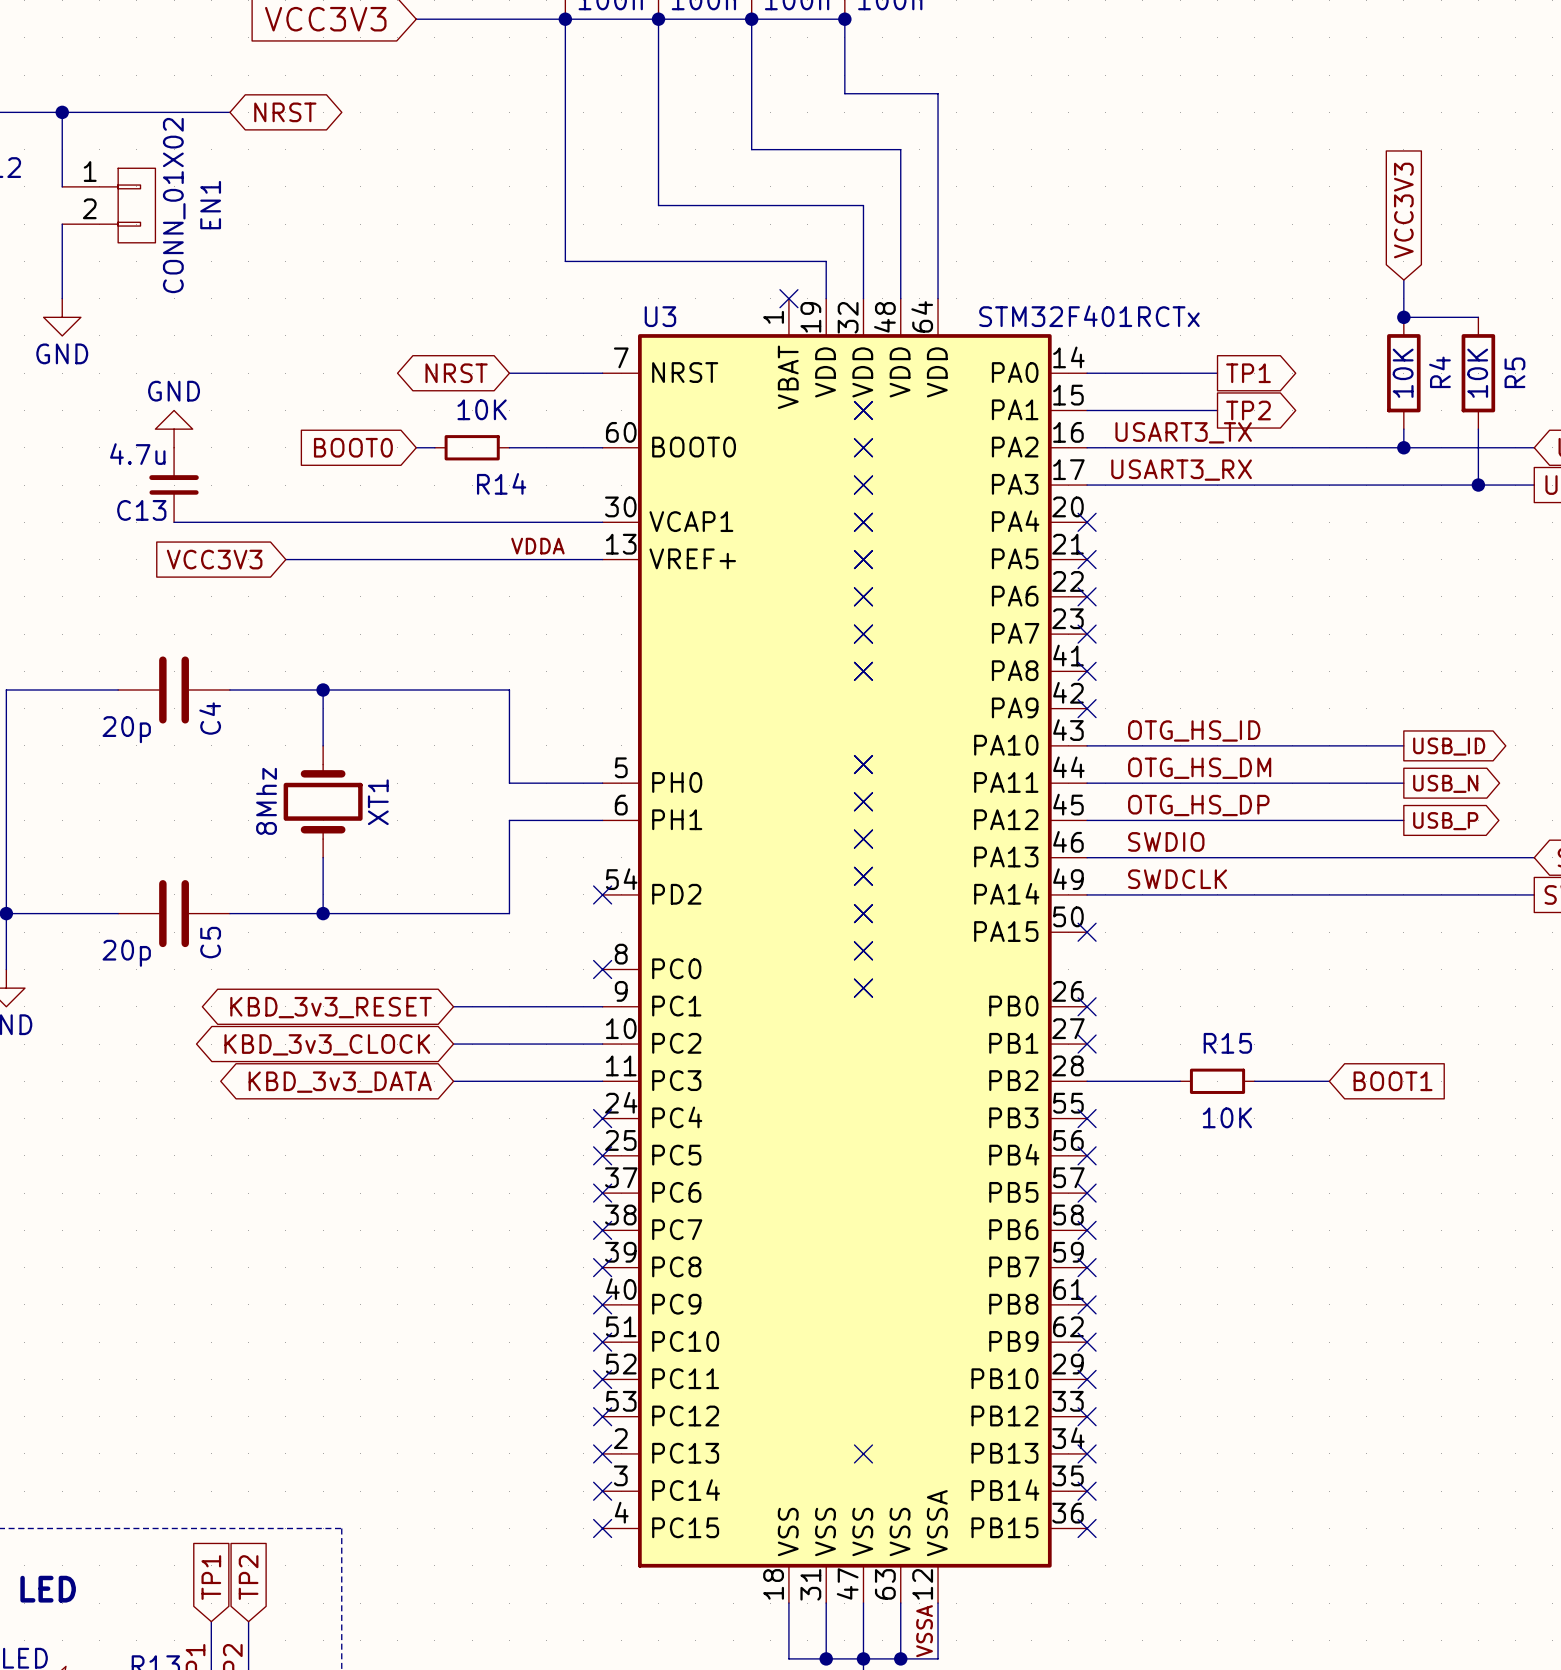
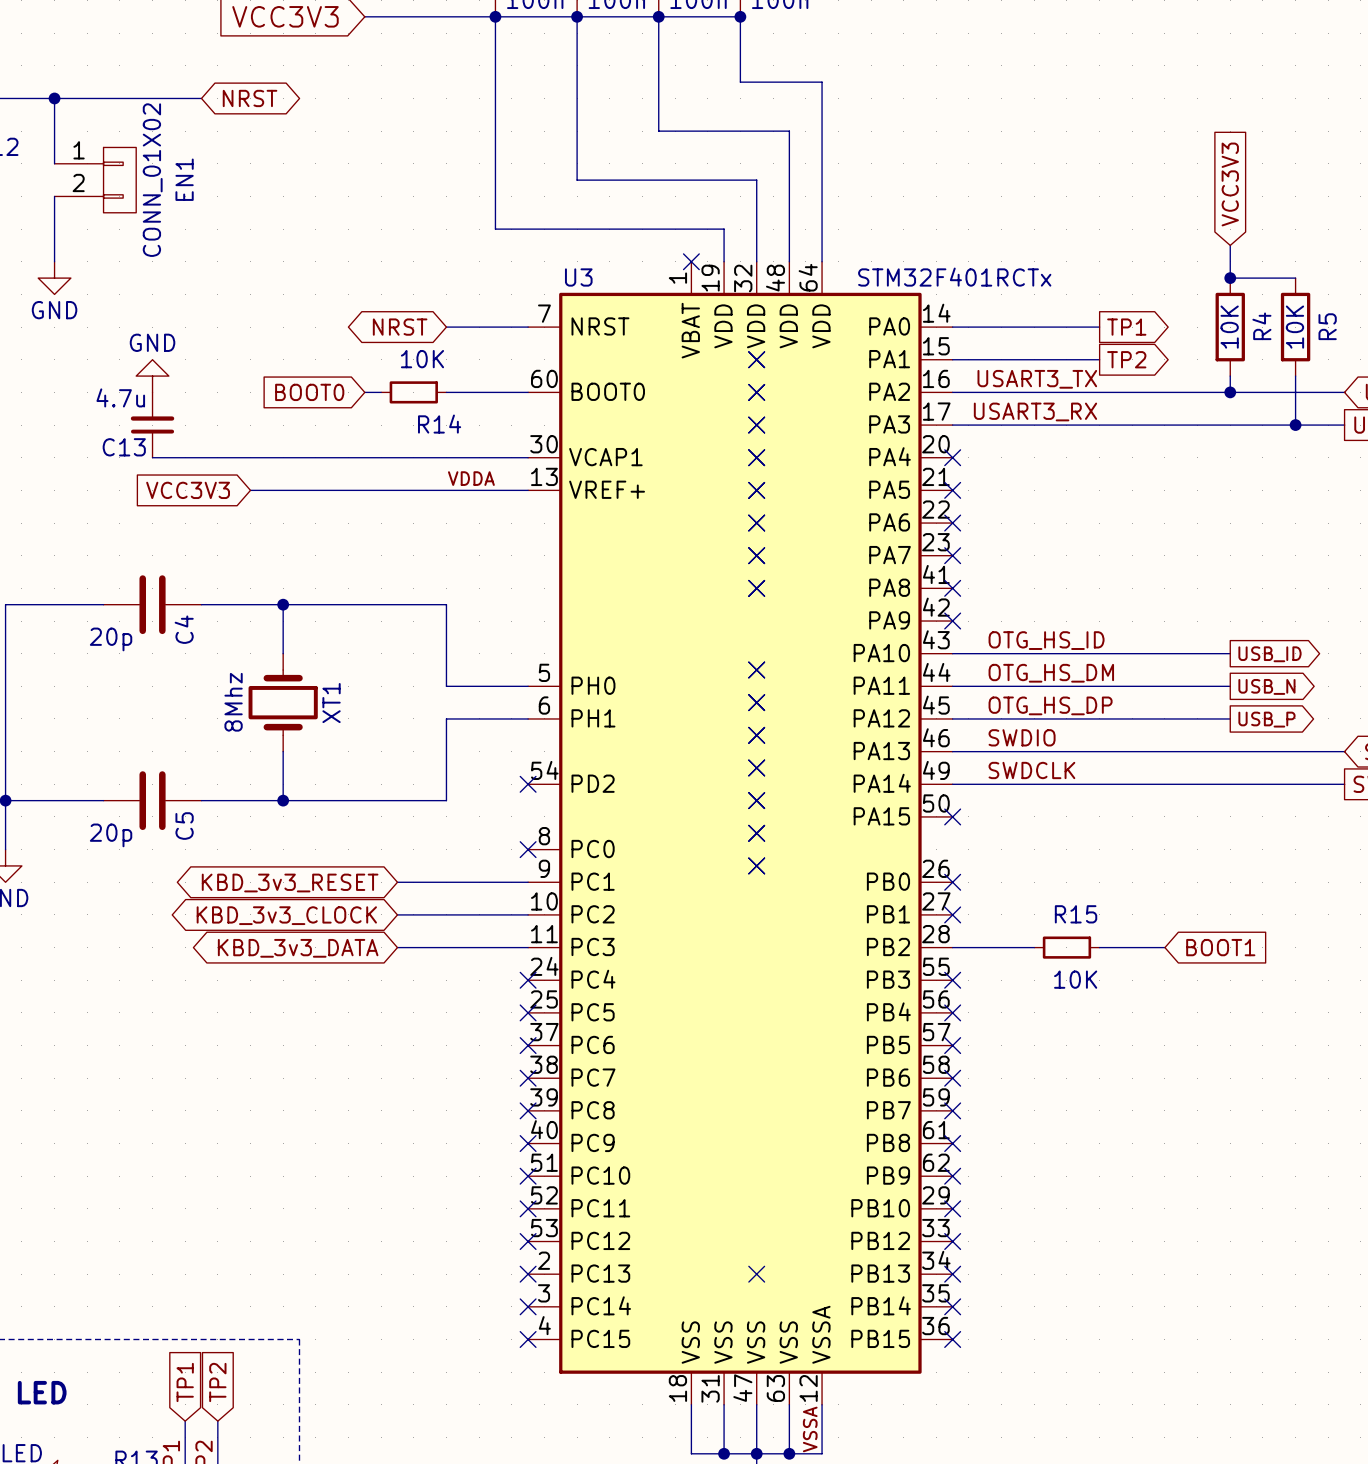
wire: none -> (1066, 327) (1099, 327)
global label position: TP1 (1248, 373) -> TP1 (1126, 327)
wire: none -> (1066, 359) (1099, 359)
global label position: TP2 (1248, 410) -> TP2 (1126, 359)

